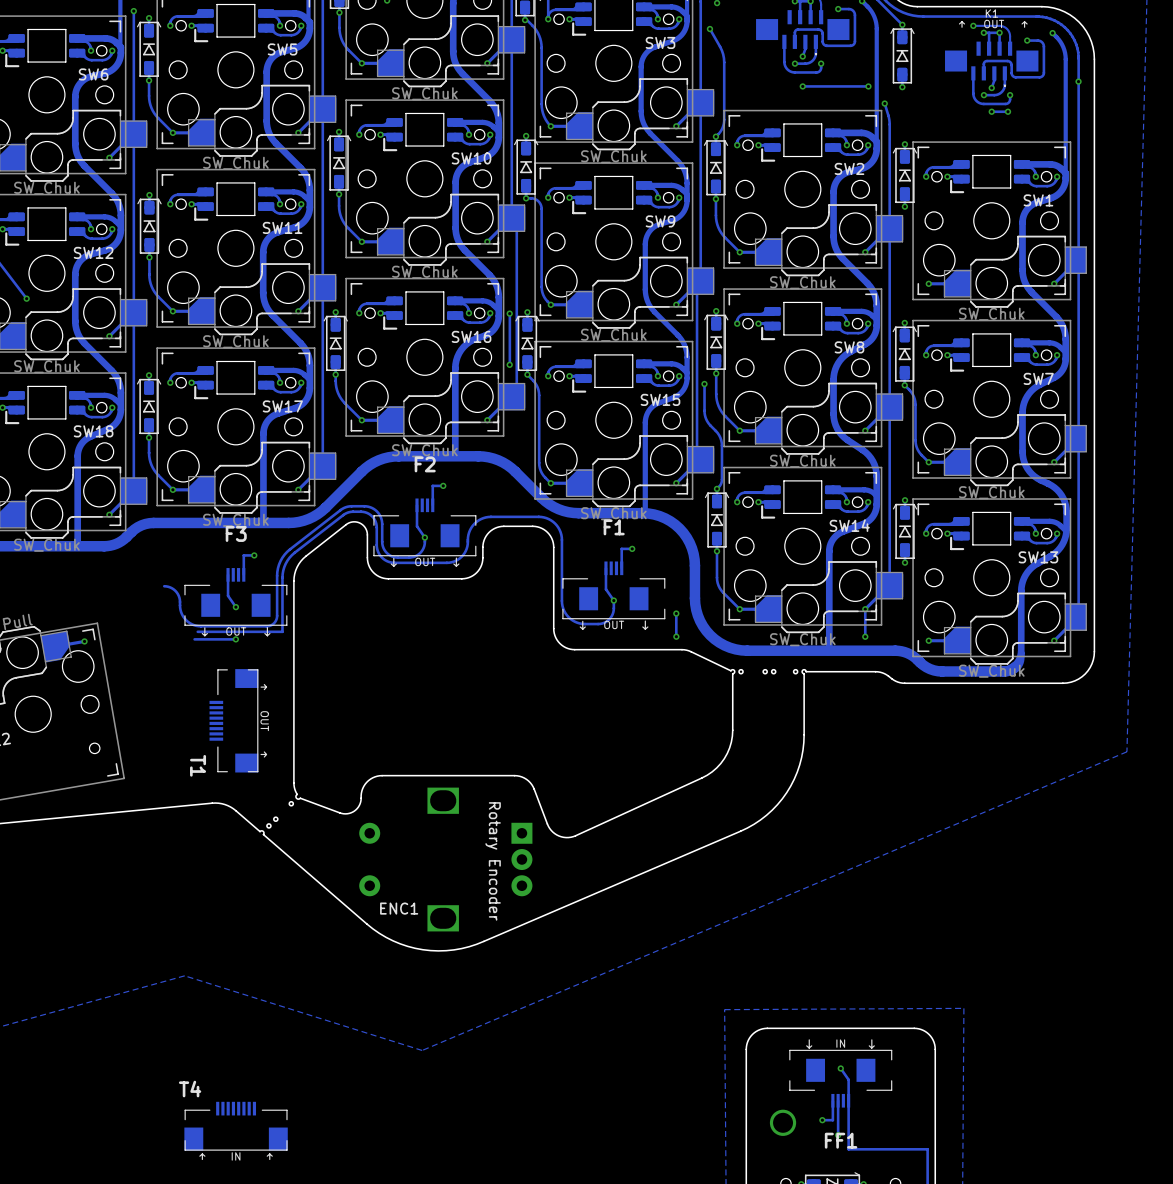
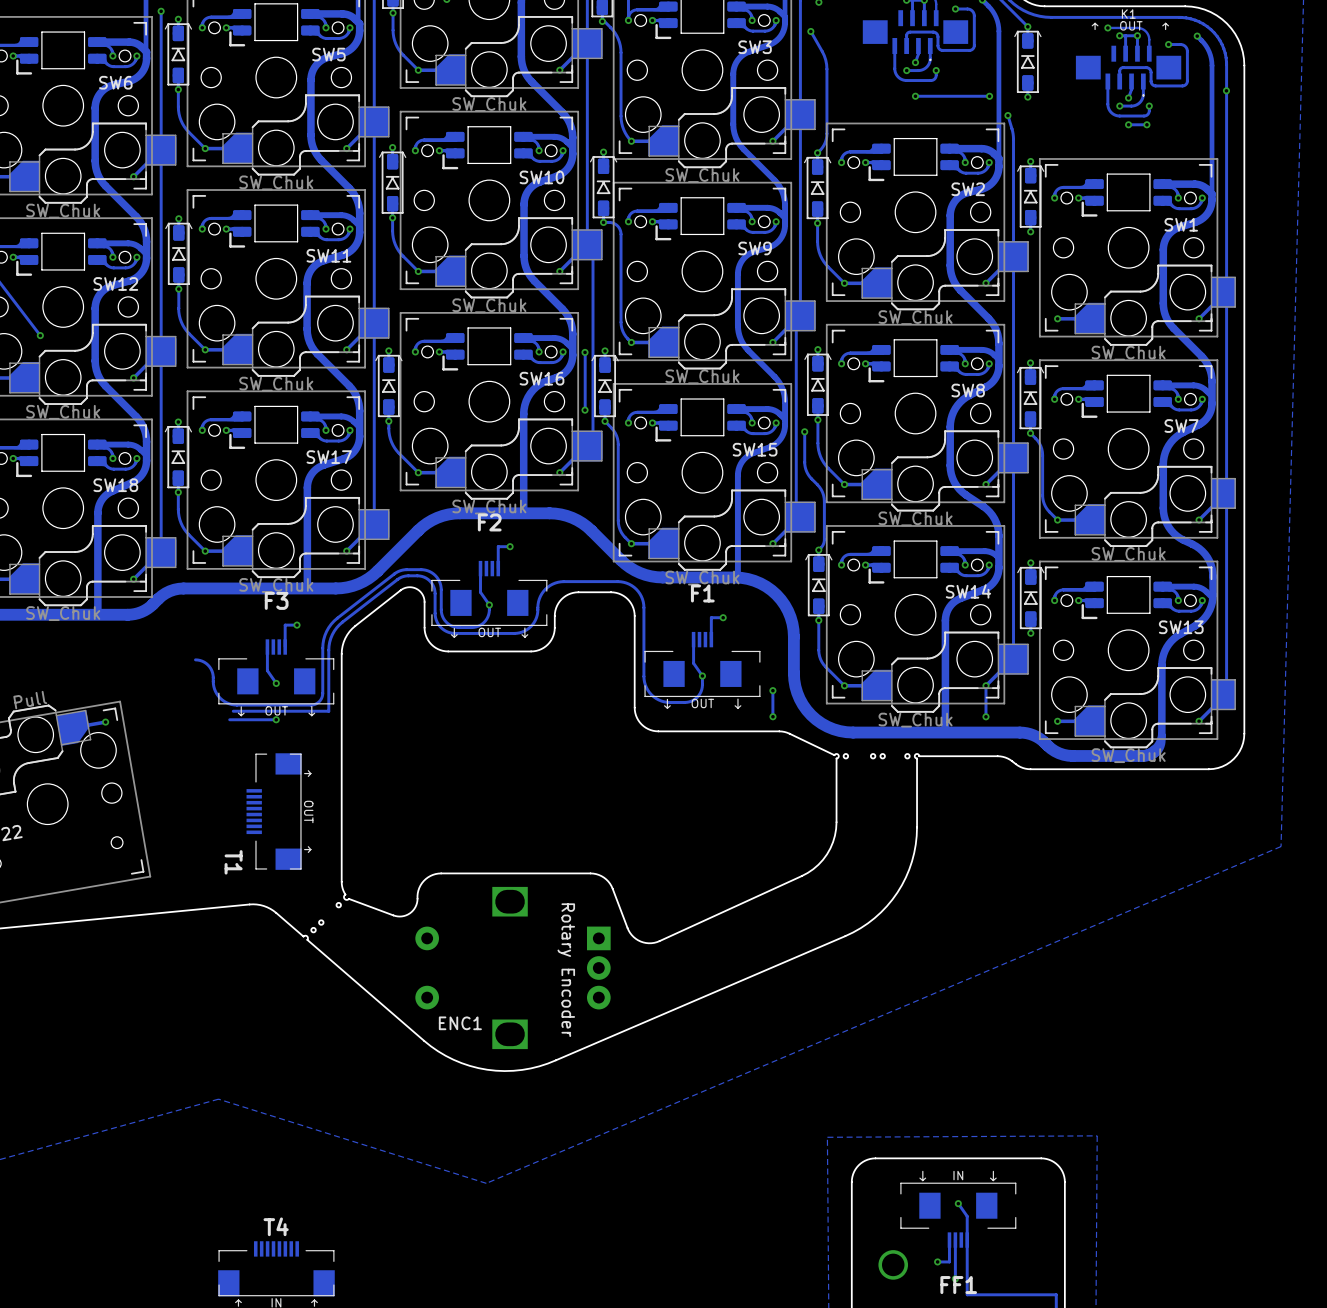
T4 name position: T4 (190, 1089) -> T4 (276, 1226)

